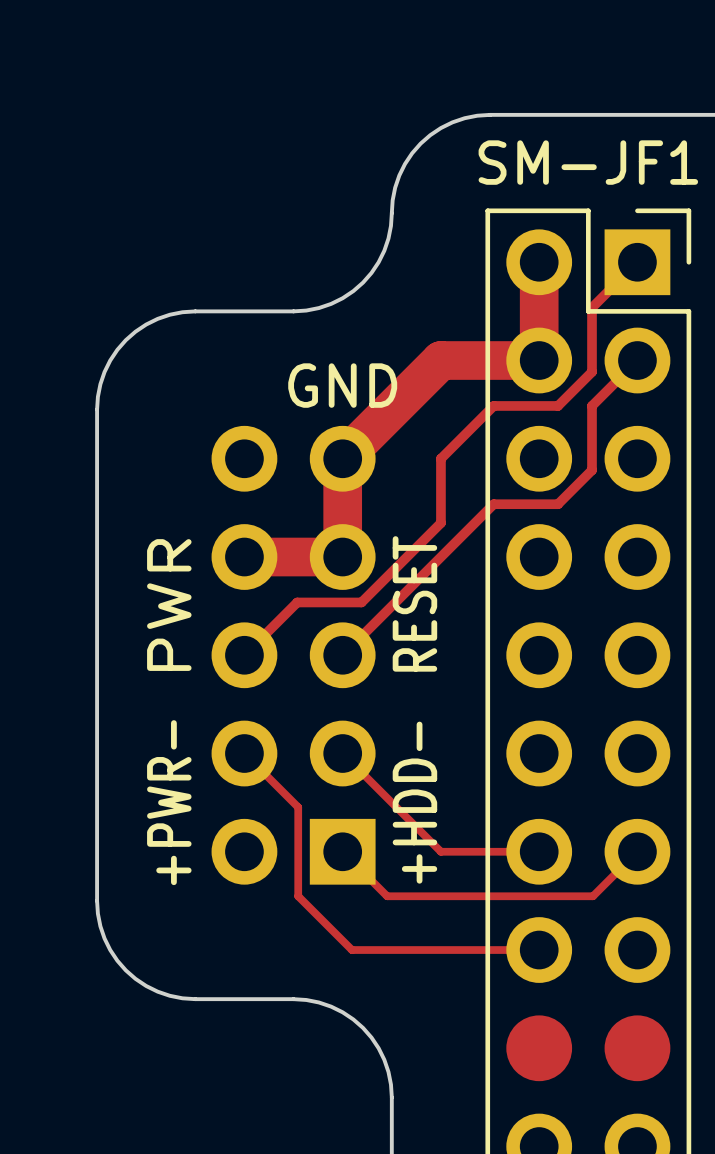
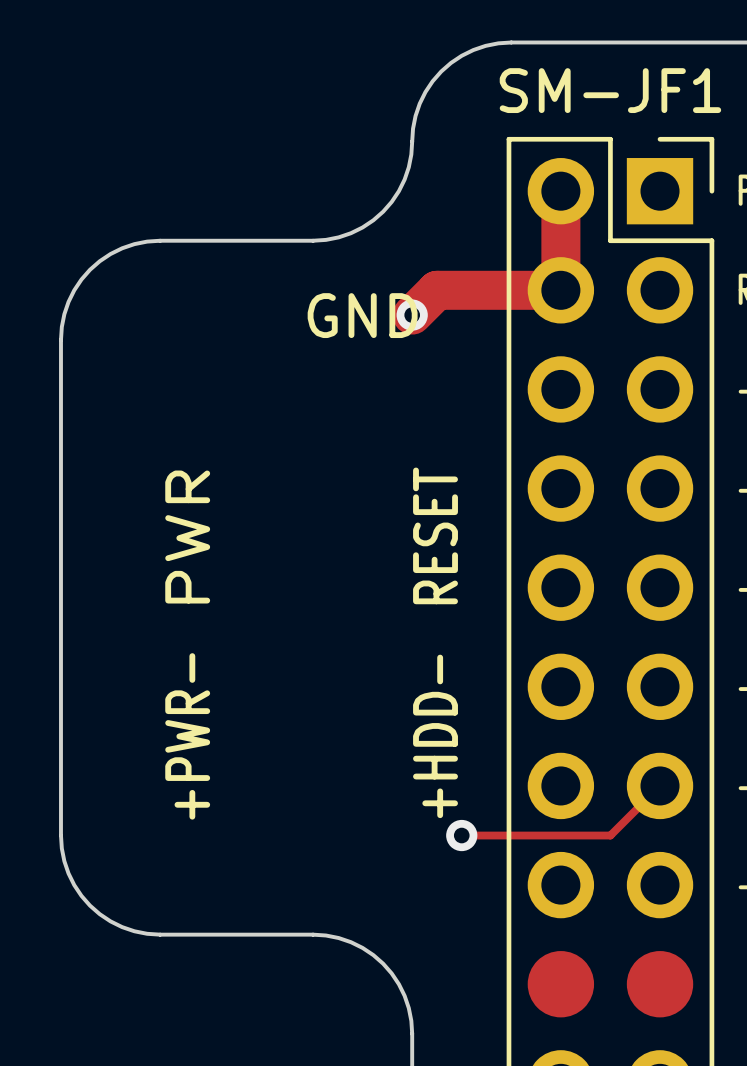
track: (637, 262) (592, 307) (592, 371) (558, 405) (493, 405) (440, 458) (440, 523) (361, 602) (297, 602) (244, 655) -> none
board edge: (195, 311) (182, 312) (157, 318) (135, 331) (125, 340) (117, 349) (104, 372) (100, 384) (97, 409) (97, 913) (100, 926) (110, 950) (125, 970) (135, 978) (157, 991) (182, 998) (195, 999) -> (213, 240) (147, 241) (134, 244) (110, 254) (90, 269) (74, 290) (64, 314) (60, 339) (60, 835) (64, 861) (68, 873) (81, 895) (99, 914) (122, 927) (147, 933) (213, 934)
track: (440, 360) (342, 458) (342, 557) (244, 557) -> (461, 290) (436, 290) (412, 315)
track: (637, 360) (592, 405) (592, 470) (558, 504) (493, 504) (342, 655) -> none
via: none -> (412, 315)
part: (293, 655) -> none
track: (244, 753) (298, 807) (298, 896) (351, 950) (539, 950) -> none
track: (342, 753) (440, 851) (539, 851) -> none
track: (342, 851) (387, 896) (592, 896) -> (461, 835) (610, 835) (615, 830)
via: none -> (461, 835)

